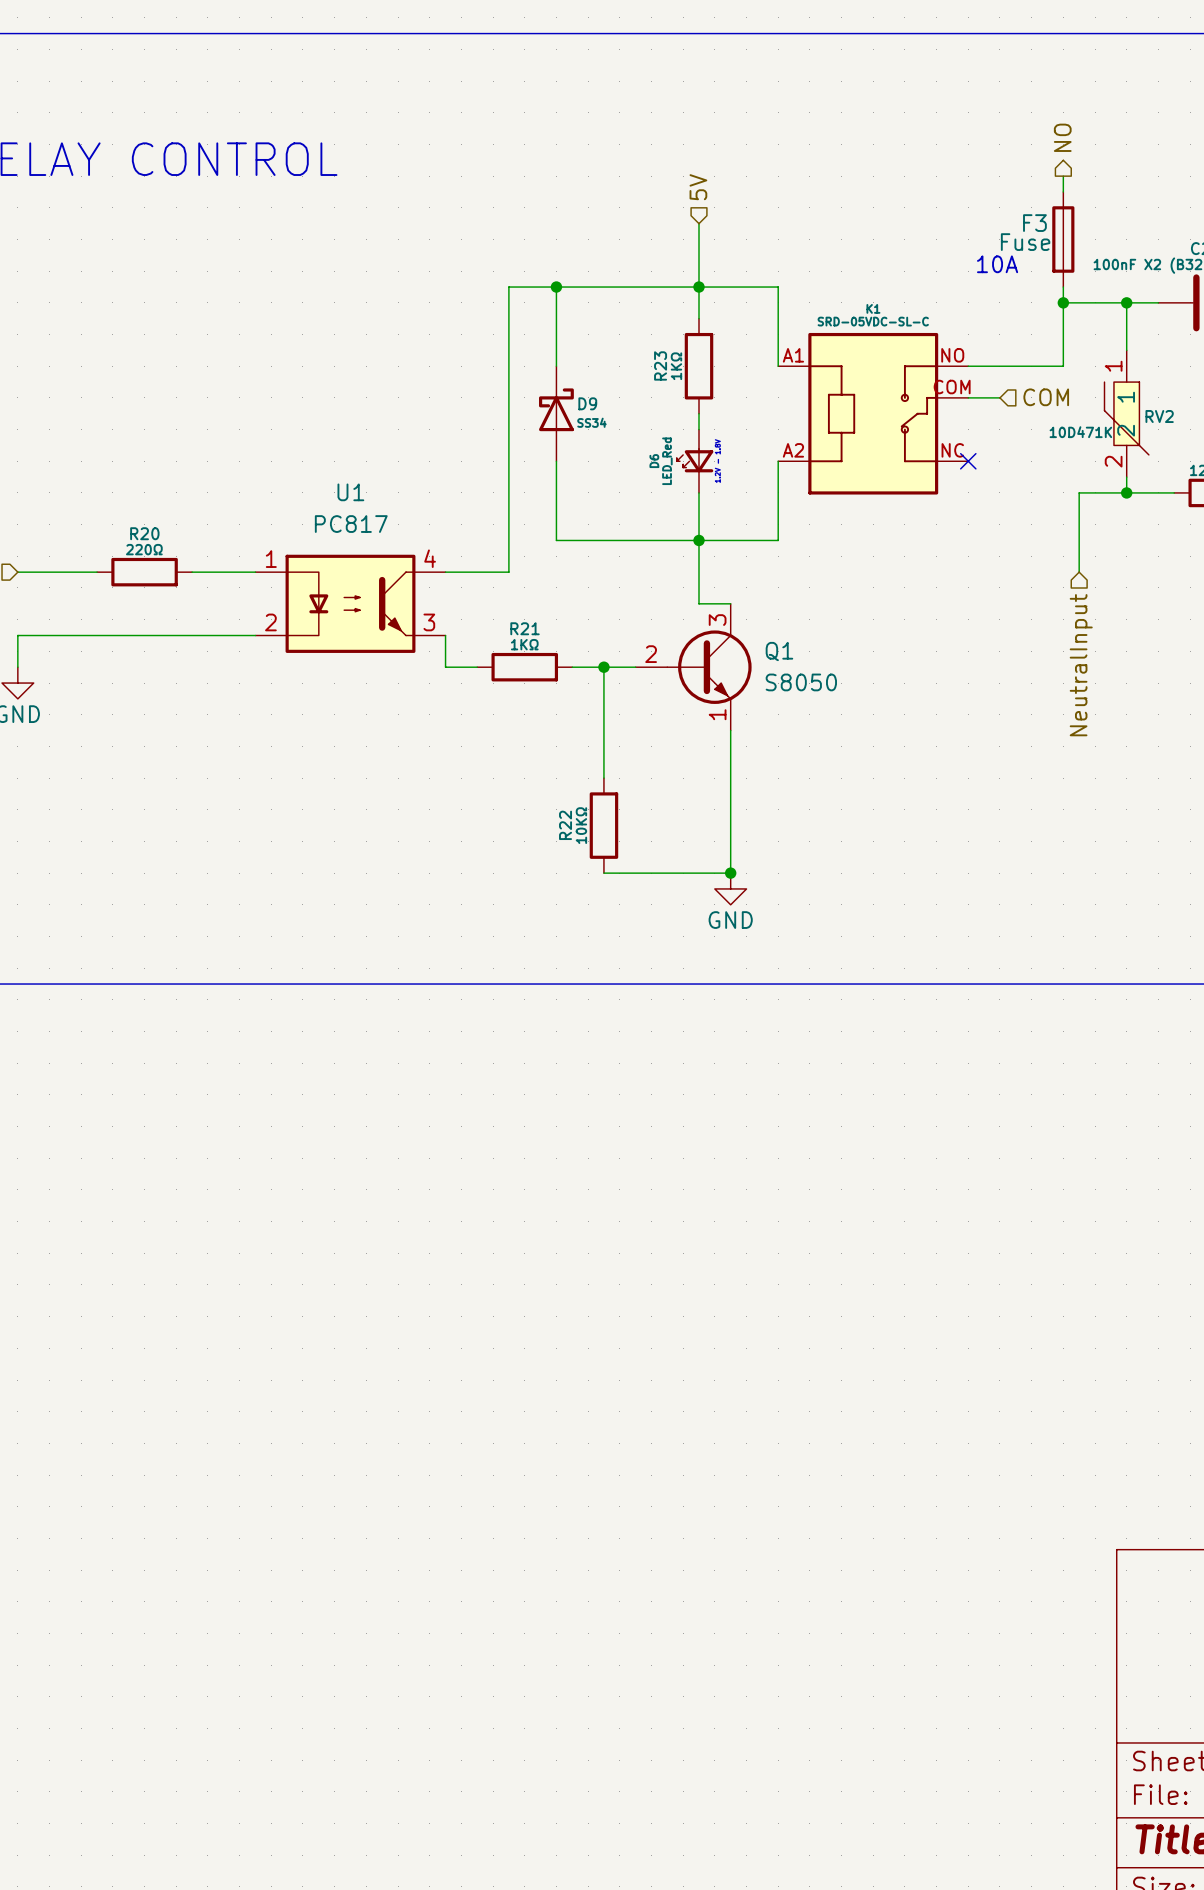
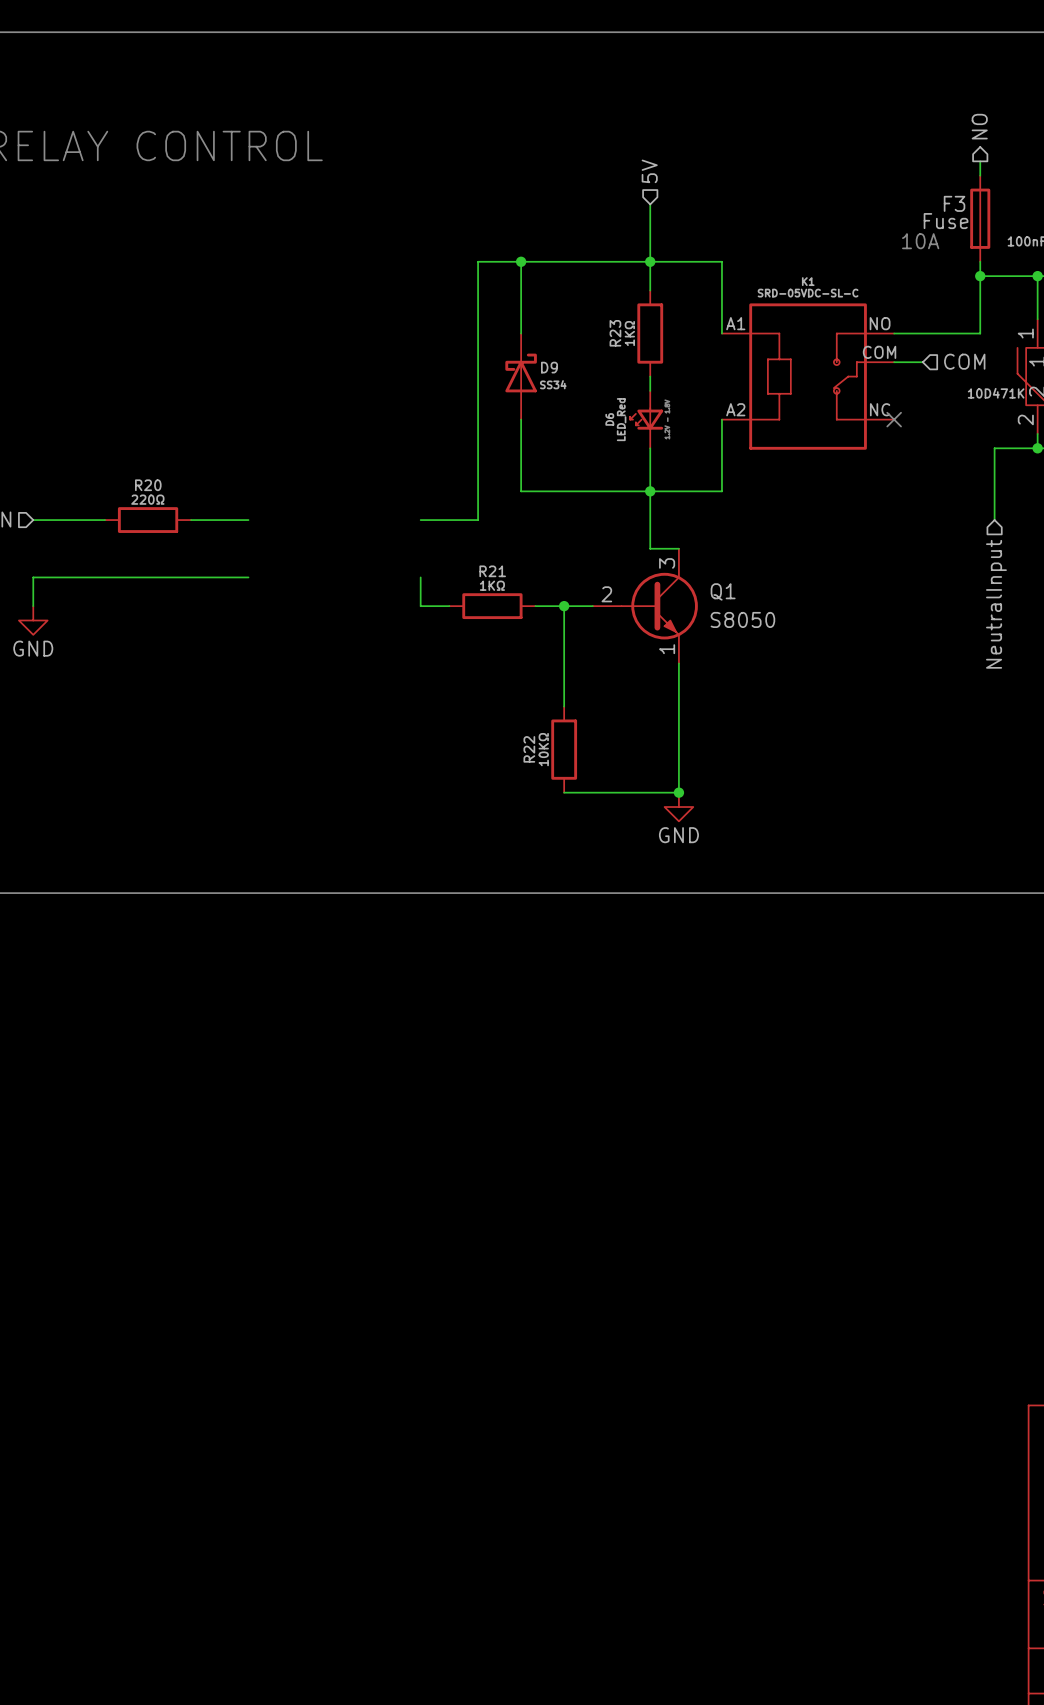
U1: PC817 (350, 603) -> none

